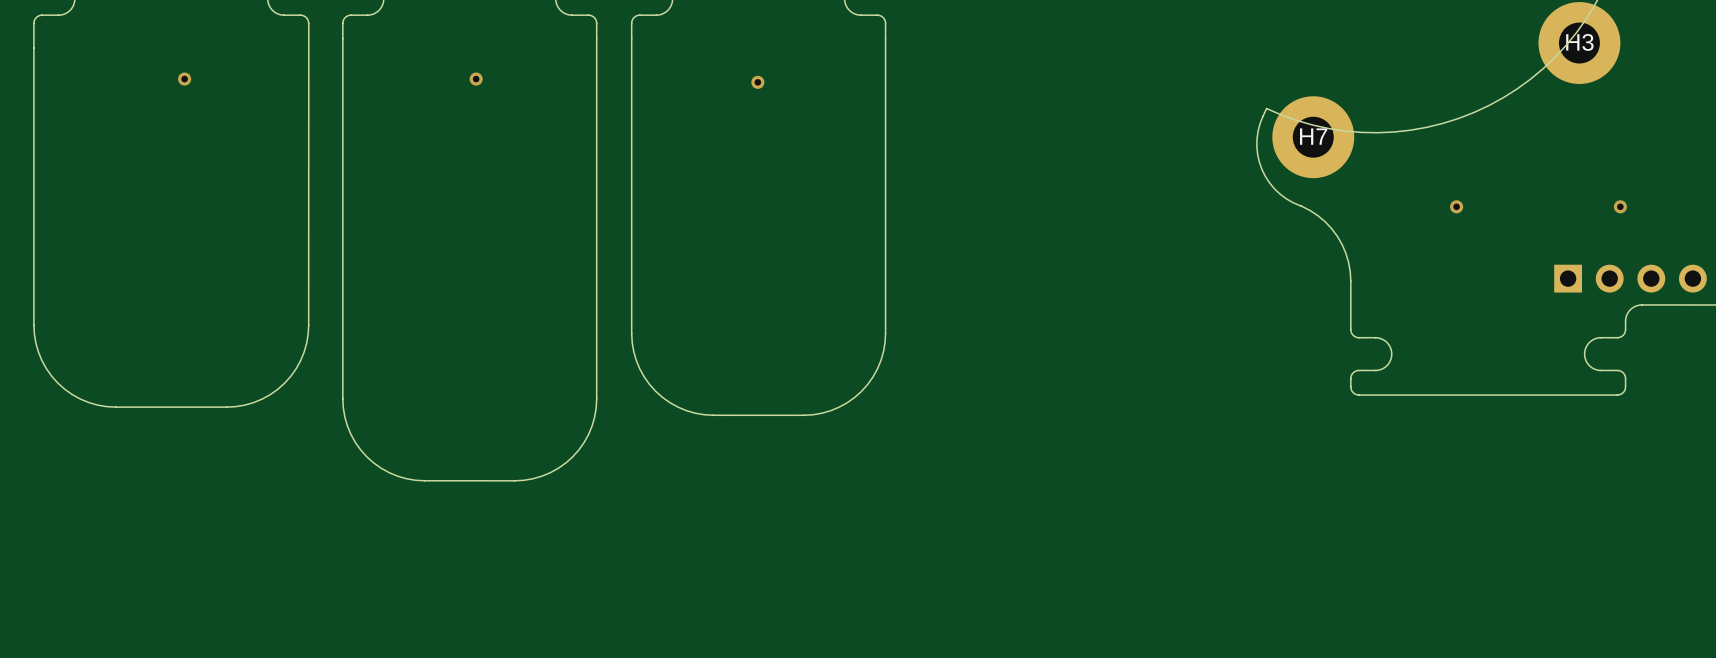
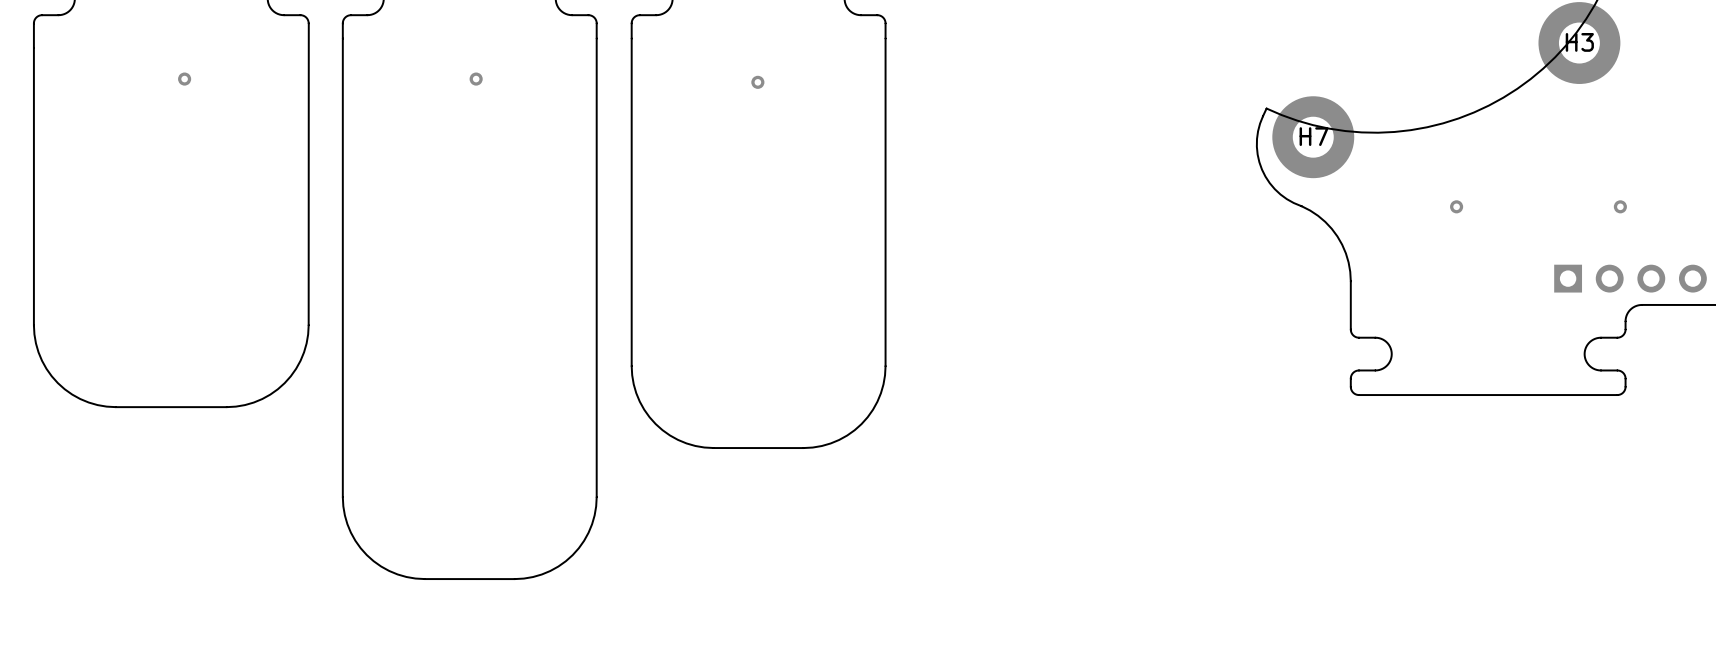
board edge: (631, 333) (633, 351) (644, 376) (662, 397) (678, 407) (704, 414) (803, 415) (821, 413) (839, 407) (861, 391) (873, 376) (880, 360) (885, 333) -> (631, 333) (632, 375) (636, 393) (649, 417) (670, 435) (686, 443) (704, 447) (803, 448) (821, 446) (839, 439) (854, 430) (867, 417) (877, 401) (883, 384) (885, 333)
board edge: (342, 398) (344, 417) (355, 442) (373, 462) (389, 472) (415, 480) (514, 480) (533, 478) (550, 472) (572, 456) (584, 442) (592, 425) (596, 398) -> (342, 398) (343, 506) (350, 532) (366, 555) (389, 570) (415, 578) (514, 579) (533, 577) (558, 566) (572, 555) (588, 532) (596, 506) (596, 398)

